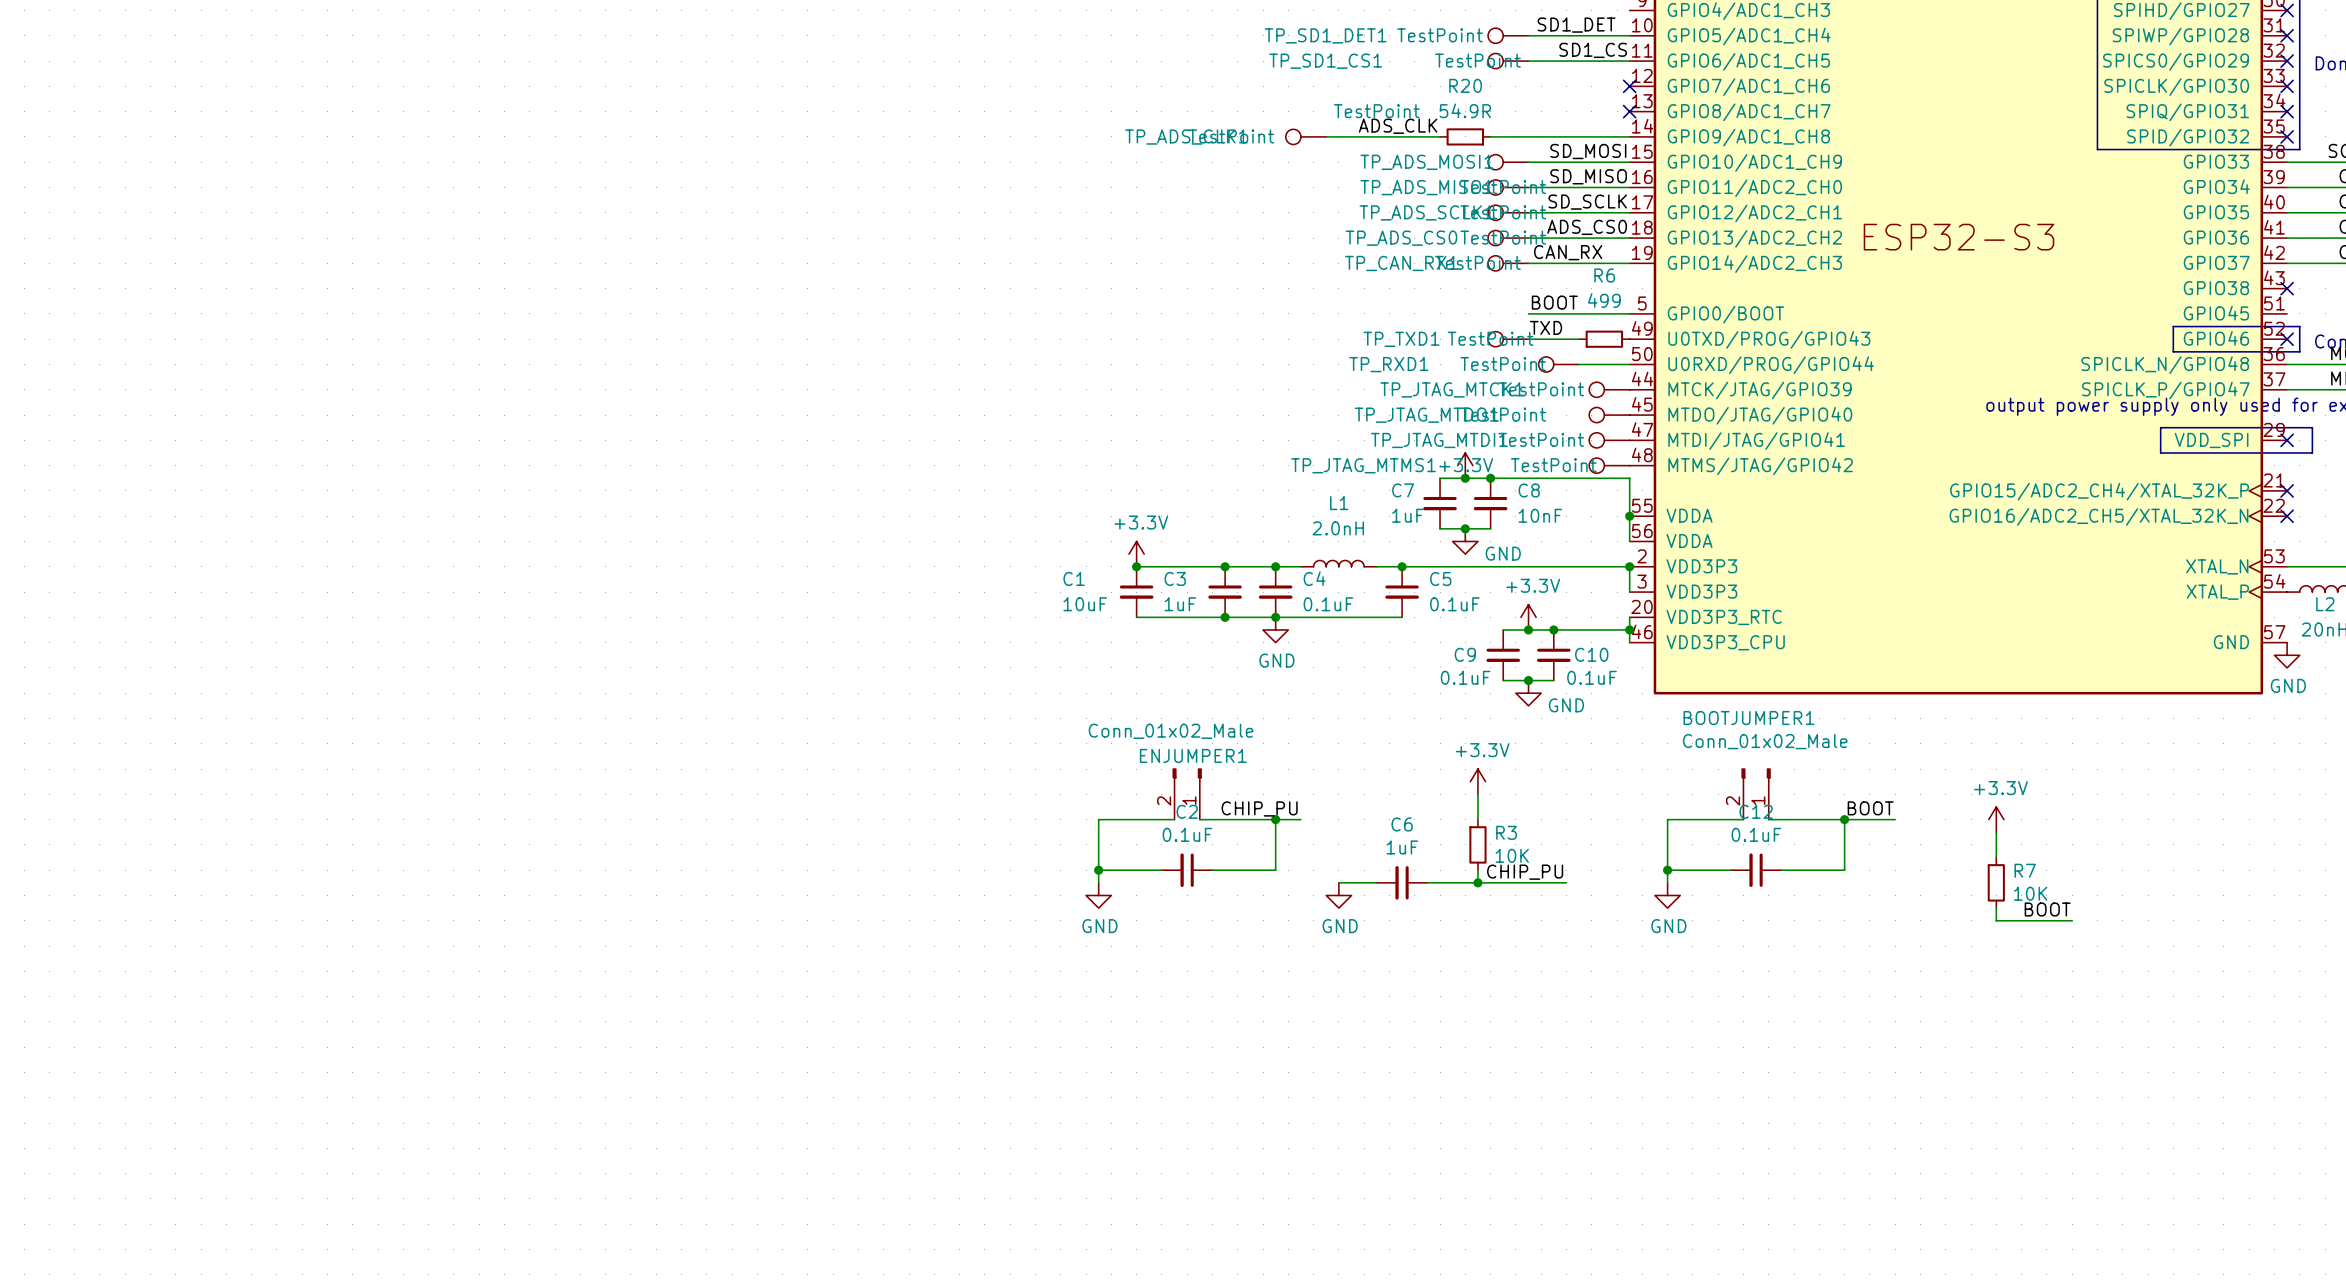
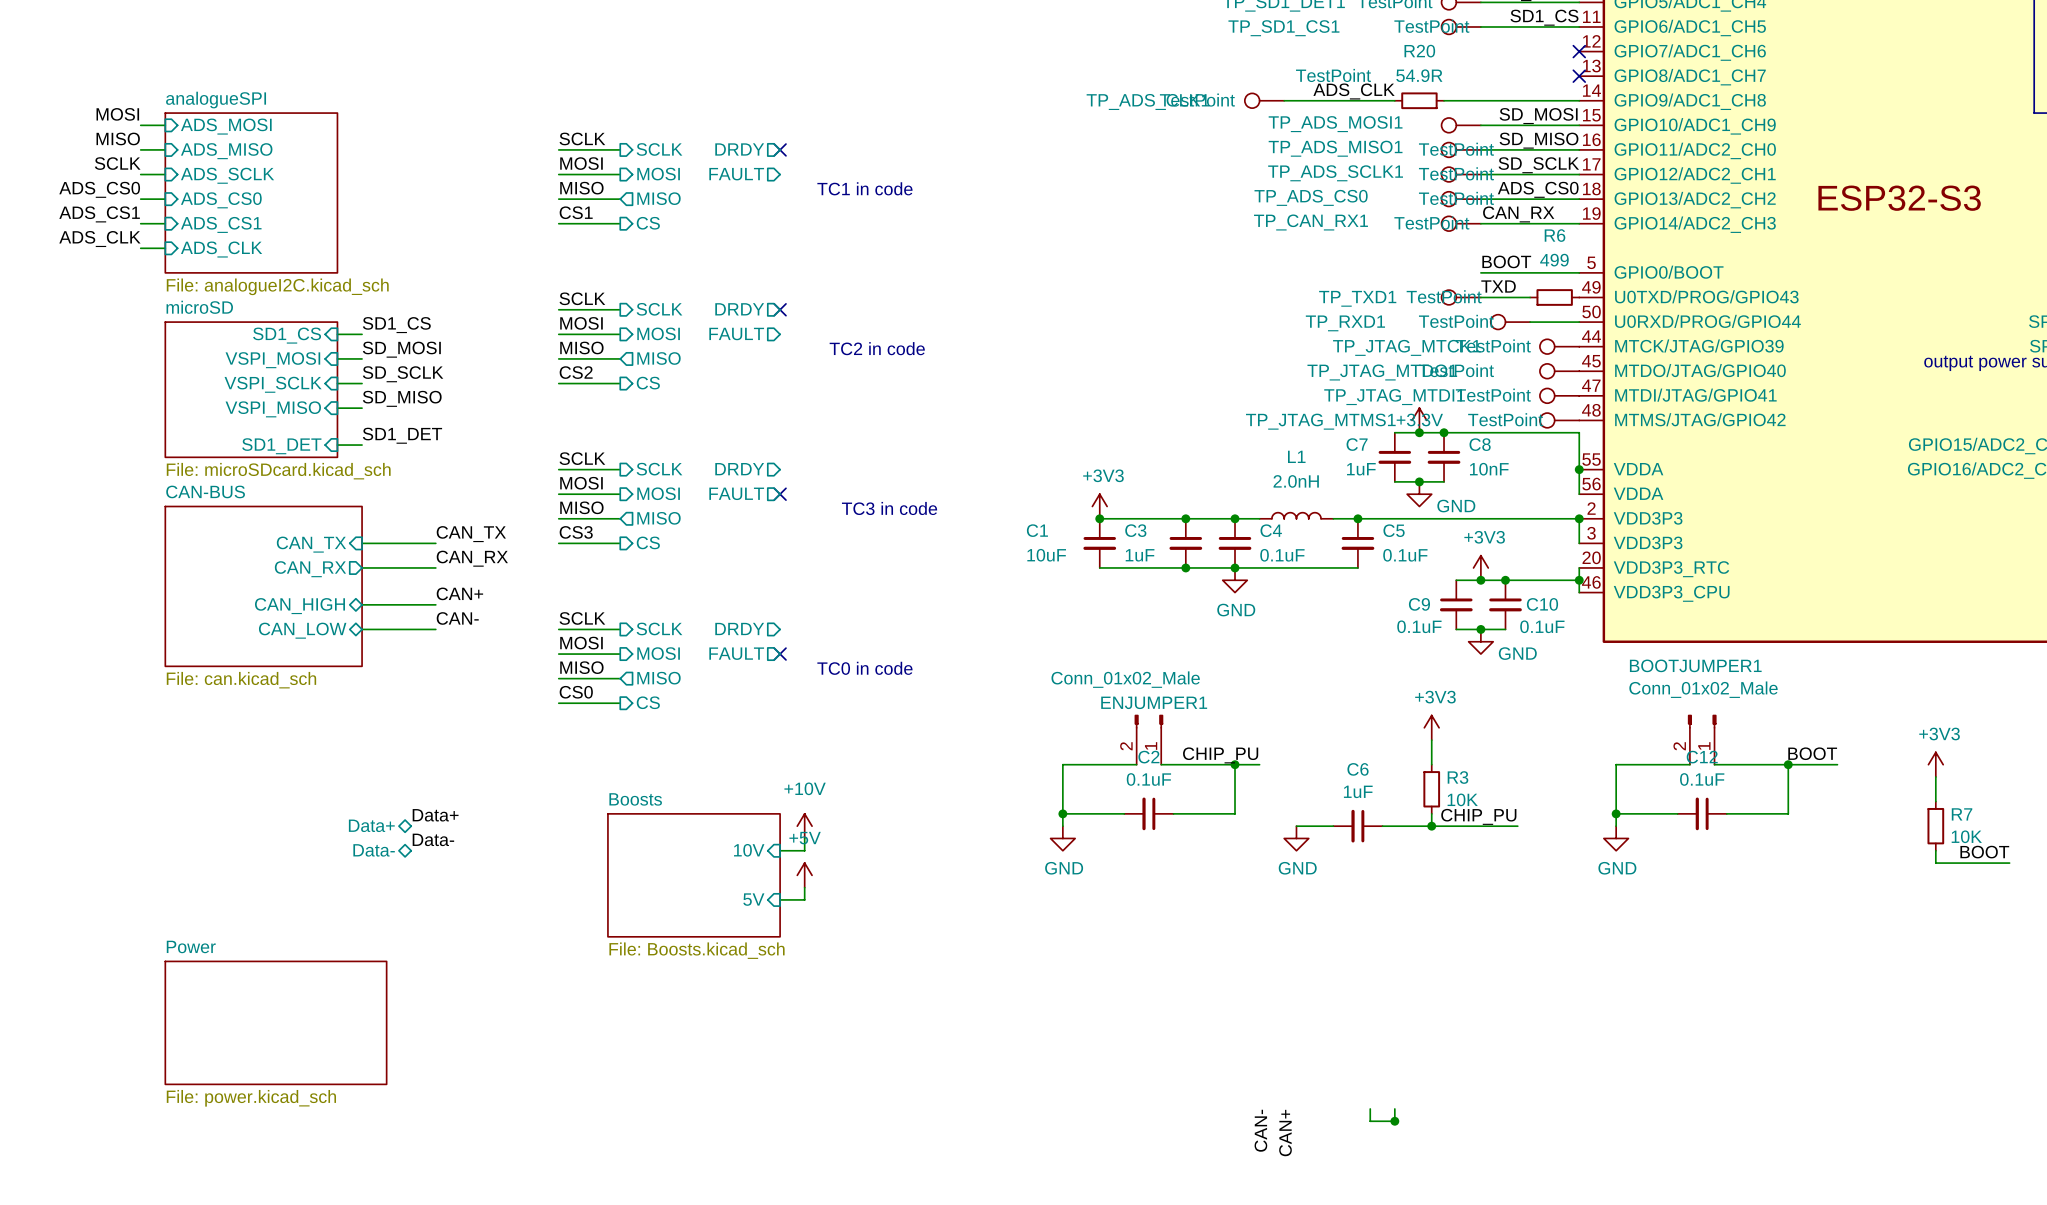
label: none -> MOSI (117, 114)
wire: none -> (140, 125) (165, 125)
sheet pin: none -> ADS_MOSI (226, 126)
TP_ADS_MOSI1 name position: TP_ADS_MOSI1 (1426, 162) -> TP_ADS_MOSI1 (1335, 124)
label: none -> MISO (118, 138)
label: none -> SCLK (582, 138)
wire: none -> (140, 149) (165, 149)
sheet pin: none -> ADS_MISO (226, 151)
wire: none -> (558, 149) (620, 149)
sheet pin: none -> SCLK (659, 149)
sheet pin: none -> DRDY (739, 149)
no-connect mark: none -> (780, 149)
TP_ADS_MISO1 name position: TP_ADS_MISO1 (1426, 187) -> TP_ADS_MISO1 (1335, 148)
label: none -> SCLK (117, 163)
label: none -> MOSI (581, 163)
wire: none -> (140, 174) (165, 174)
sheet pin: none -> ADS_SCLK (227, 175)
wire: none -> (558, 174) (620, 174)
sheet pin: none -> MOSI (658, 174)
sheet pin: none -> FAULT (736, 174)
TP_ADS_SCLK1 name position: TP_ADS_SCLK1 (1426, 212) -> TP_ADS_SCLK1 (1335, 173)
label: none -> MISO (581, 188)
label: none -> ADS_CS0 (99, 189)
text: none -> TC1 in code (864, 188)
sheet analogueSPI: none -> File: analogueI2C.kicad_sch (251, 192)
sheet pin: none -> MISO (659, 198)
wire: none -> (140, 199) (165, 199)
sheet pin: none -> ADS_CS0 (221, 200)
wire: none -> (558, 199) (620, 199)
TP_ADS_CS0 name position: TP_ADS_CS0 (1401, 238) -> TP_ADS_CS0 (1311, 197)
label: none -> ADS_CS1 (99, 214)
label: none -> CS1 (576, 212)
sheet pin: none -> CS (648, 223)
wire: none -> (140, 223) (165, 223)
sheet pin: none -> ADS_CS1 (221, 224)
wire: none -> (558, 223) (620, 223)
TP_CAN_RX1 name position: TP_CAN_RX1 (1401, 263) -> TP_CAN_RX1 (1310, 222)
label: none -> ADS_CLK (99, 239)
wire: none -> (140, 248) (165, 248)
sheet pin: none -> ADS_CLK (221, 249)
label: none -> SCLK (582, 298)
wire: none -> (558, 309) (620, 309)
sheet pin: none -> SCLK (659, 309)
sheet pin: none -> DRDY (739, 309)
no-connect mark: none -> (780, 309)
label: none -> MOSI (581, 323)
label: none -> SD1_CS (396, 325)
sheet pin: none -> MOSI (658, 333)
sheet pin: none -> FAULT (736, 334)
sheet pin: none -> SD1_CS (287, 335)
wire: none -> (337, 334) (362, 334)
wire: none -> (558, 334) (620, 334)
label: none -> SD_MOSI (401, 349)
label: none -> MISO (581, 347)
text: none -> TC2 in code (877, 348)
sheet pin: none -> MISO (659, 358)
sheet pin: none -> VSPI_MOSI (272, 360)
wire: none -> (337, 358) (362, 358)
wire: none -> (558, 358) (620, 358)
label: none -> CS2 (576, 372)
label: none -> SD_SCLK (403, 374)
sheet pin: none -> VSPI_SCLK (273, 384)
wire: none -> (337, 383) (362, 383)
wire: none -> (558, 383) (620, 383)
sheet pin: none -> CS (648, 383)
sheet microSD: none -> File: microSDcard.kicad_sch (251, 389)
label: none -> SD_MISO (402, 398)
wire: none -> (337, 408) (362, 408)
sheet pin: none -> VSPI_MISO (273, 409)
label: none -> SD1_DET (402, 435)
wire: none -> (337, 445) (362, 445)
sheet pin: none -> SD1_DET (281, 446)
label: none -> SCLK (582, 458)
sheet pin: none -> SCLK (659, 469)
sheet pin: none -> DRDY (739, 469)
wire: none -> (558, 469) (620, 469)
label: none -> MOSI (581, 483)
wire: none -> (558, 494) (620, 494)
sheet pin: none -> MOSI (658, 493)
sheet pin: none -> FAULT (736, 493)
no-connect mark: none -> (780, 494)
power symbol: +3.3V (1136, 554) -> +3V3 (1099, 506)
label: none -> MISO (581, 507)
text: none -> TC3 in code (889, 508)
wire: none -> (558, 518) (620, 518)
sheet pin: none -> MISO (659, 518)
label: none -> CS3 (576, 532)
label: none -> CAN_TX (471, 534)
sheet pin: none -> CS (648, 542)
sheet pin: none -> CAN_TX (311, 544)
wire: none -> (362, 543) (435, 543)
wire: none -> (558, 543) (620, 543)
label: none -> CAN_RX (472, 558)
sheet pin: none -> CAN_RX (310, 569)
wire: none -> (362, 567) (435, 567)
power symbol: +3.3V (1528, 617) -> +3V3 (1480, 567)
sheet CAN-BUS: none -> File: can.kicad_sch (263, 586)
label: none -> CAN+ (459, 593)
sheet pin: none -> CAN_HIGH (299, 606)
wire: none -> (362, 604) (435, 604)
label: none -> CAN- (457, 618)
label: none -> SCLK (582, 618)
sheet pin: none -> CAN_LOW (302, 630)
wire: none -> (362, 629) (435, 629)
wire: none -> (558, 629) (620, 629)
sheet pin: none -> SCLK (659, 628)
sheet pin: none -> DRDY (739, 628)
label: none -> MOSI (581, 643)
wire: none -> (558, 654) (620, 654)
sheet pin: none -> MOSI (658, 653)
sheet pin: none -> FAULT (736, 653)
no-connect mark: none -> (780, 654)
label: none -> MISO (581, 667)
text: none -> TC0 in code (864, 668)
sheet pin: none -> MISO (659, 678)
wire: none -> (558, 678) (620, 678)
label: none -> CS0 (576, 692)
sheet pin: none -> CS (648, 702)
wire: none -> (558, 703) (620, 703)
power symbol: +3.3V (1477, 781) -> +3V3 (1431, 727)
power symbol: +3.3V (1996, 819) -> +3V3 (1935, 764)
label: none -> Data+ (435, 815)
sheet pin: none -> Data+ (371, 825)
power symbol: none -> +10V (804, 826)
wire: none -> (804, 838) (804, 850) (780, 850)
label: none -> Data- (433, 839)
sheet pin: none -> Data- (374, 850)
sheet pin: none -> 10V (749, 850)
sheet Boosts: none -> File: Boosts.kicad_sch (694, 875)
power symbol: none -> +5V (804, 875)
wire: none -> (804, 887) (804, 899) (780, 899)
sheet pin: none -> 5V (753, 899)
sheet Power: none -> File: power.kicad_sch (275, 1022)
wire: none -> (1370, 1108) (1370, 1121) (1394, 1121) (1394, 1108)
junction: none -> (1394, 1121)
label: none -> CAN- (1260, 1130)
label: none -> CAN+ (1285, 1133)

